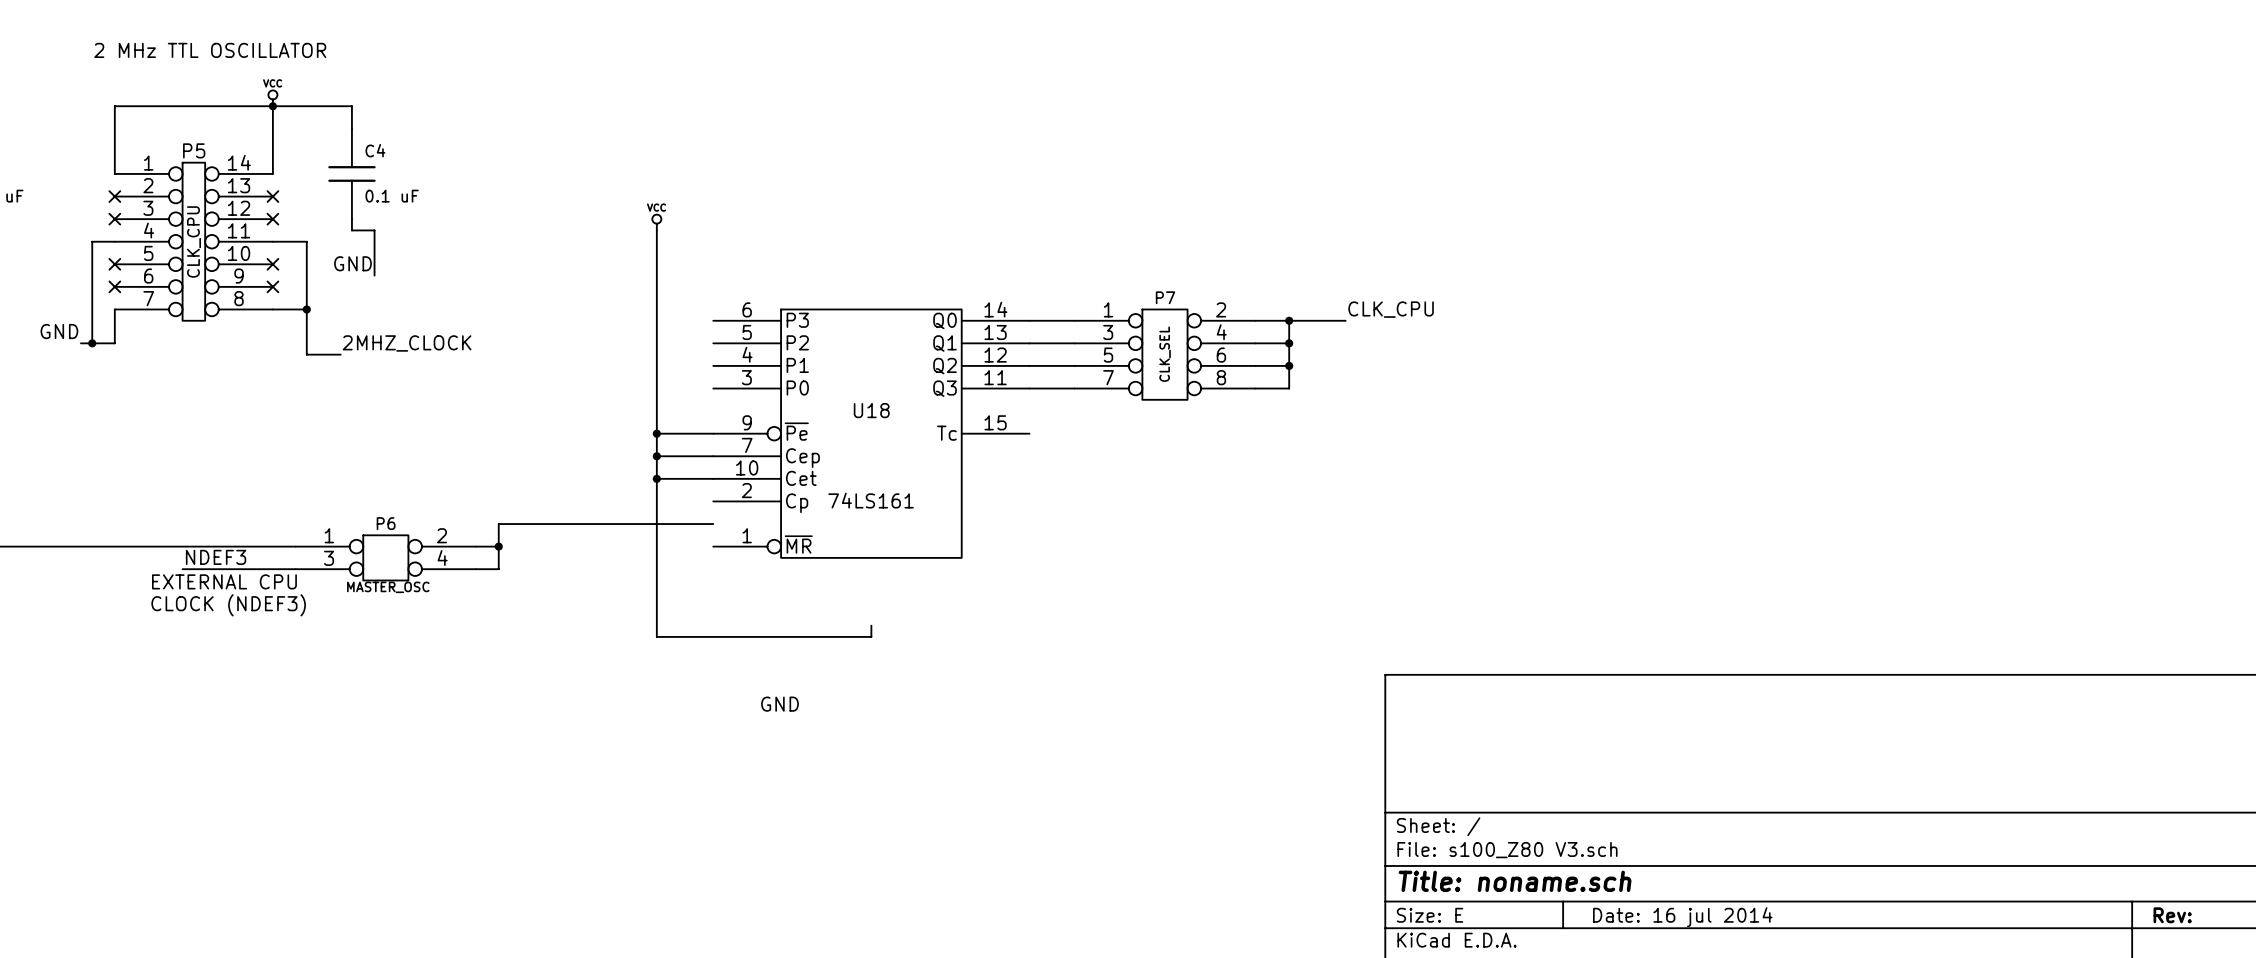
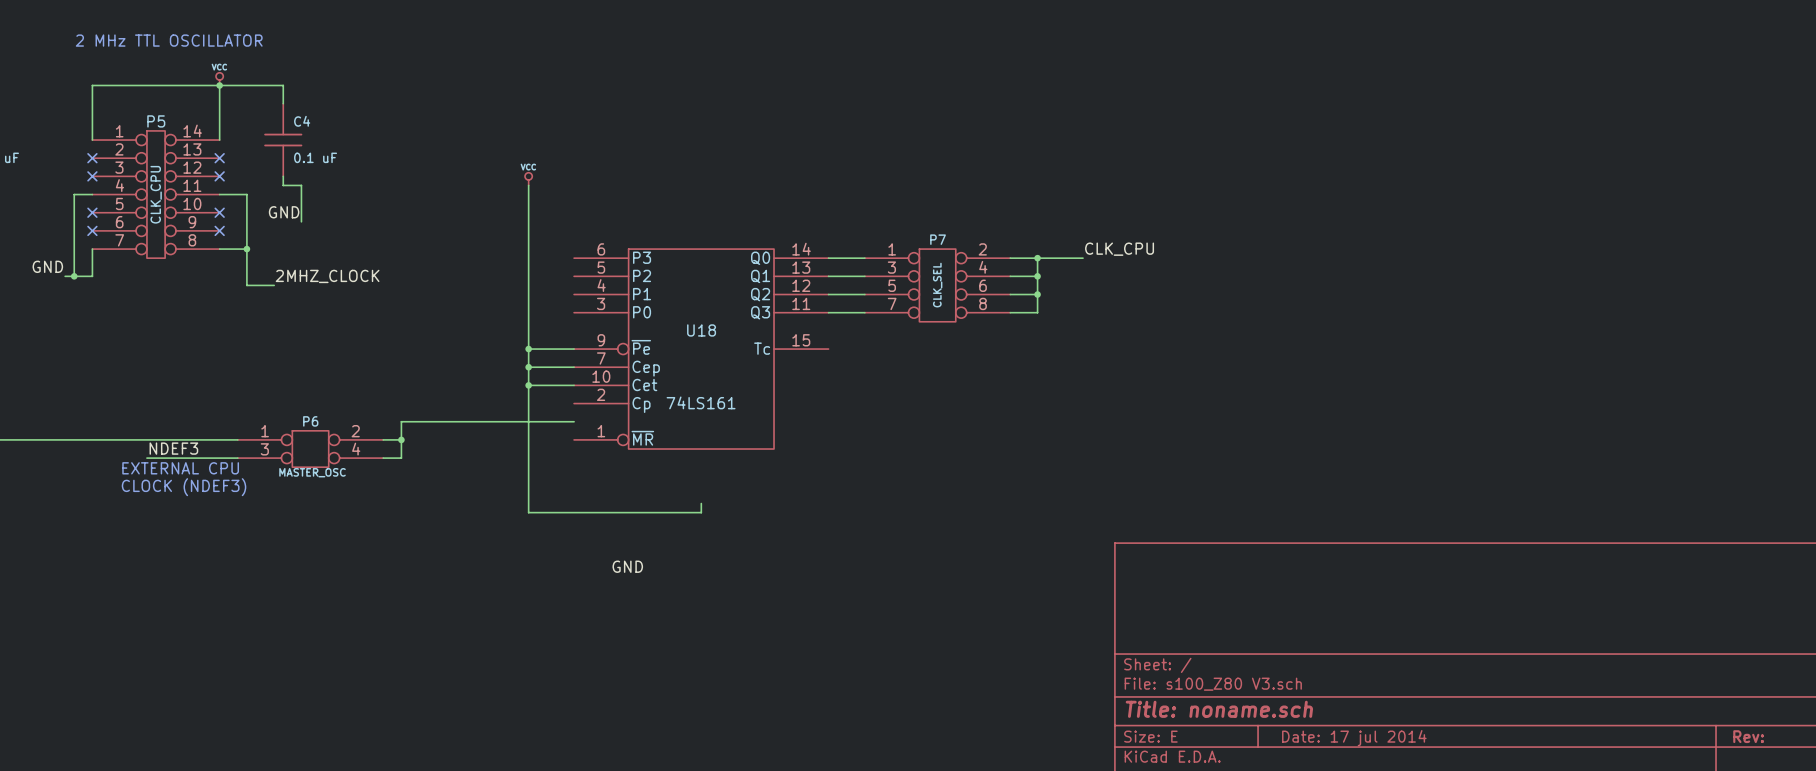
title block: Date: 16 jul 2014 (1682, 917) -> Date: 17 jul 2014 (1354, 738)

